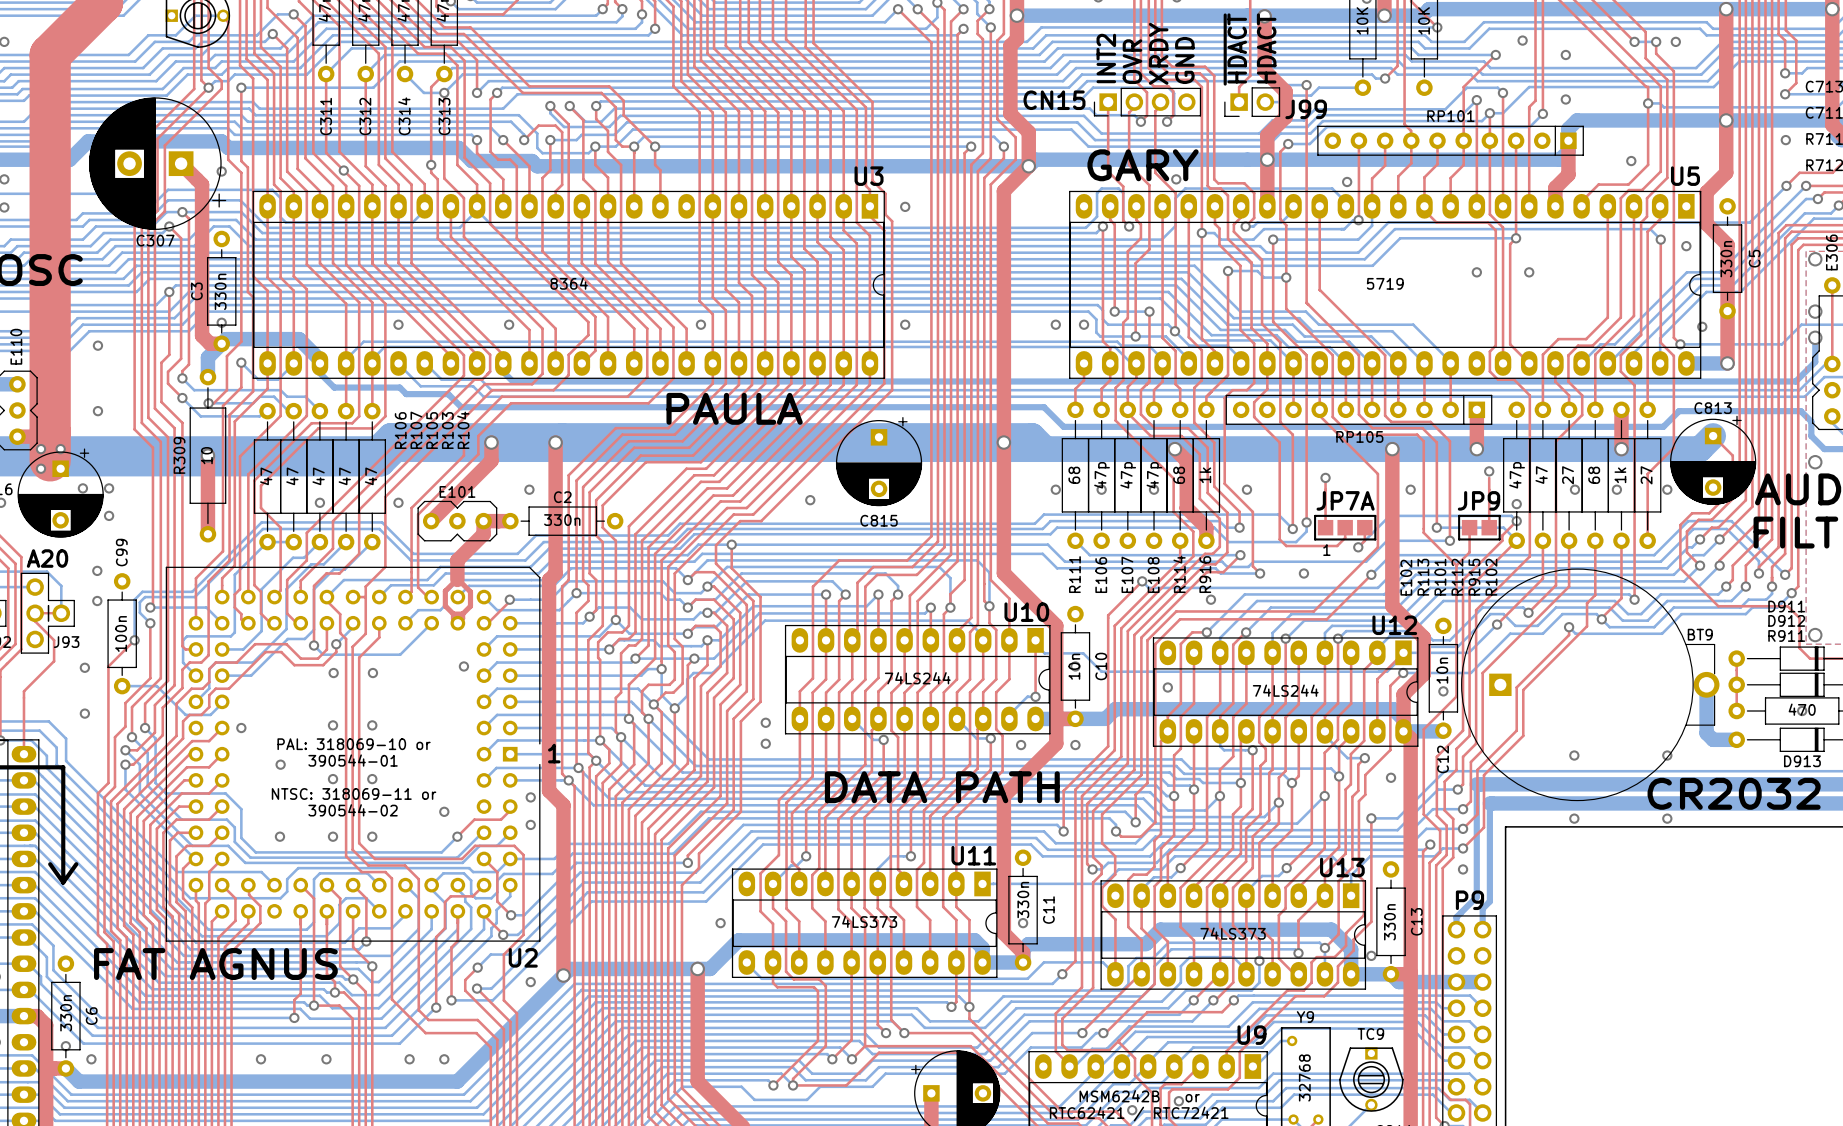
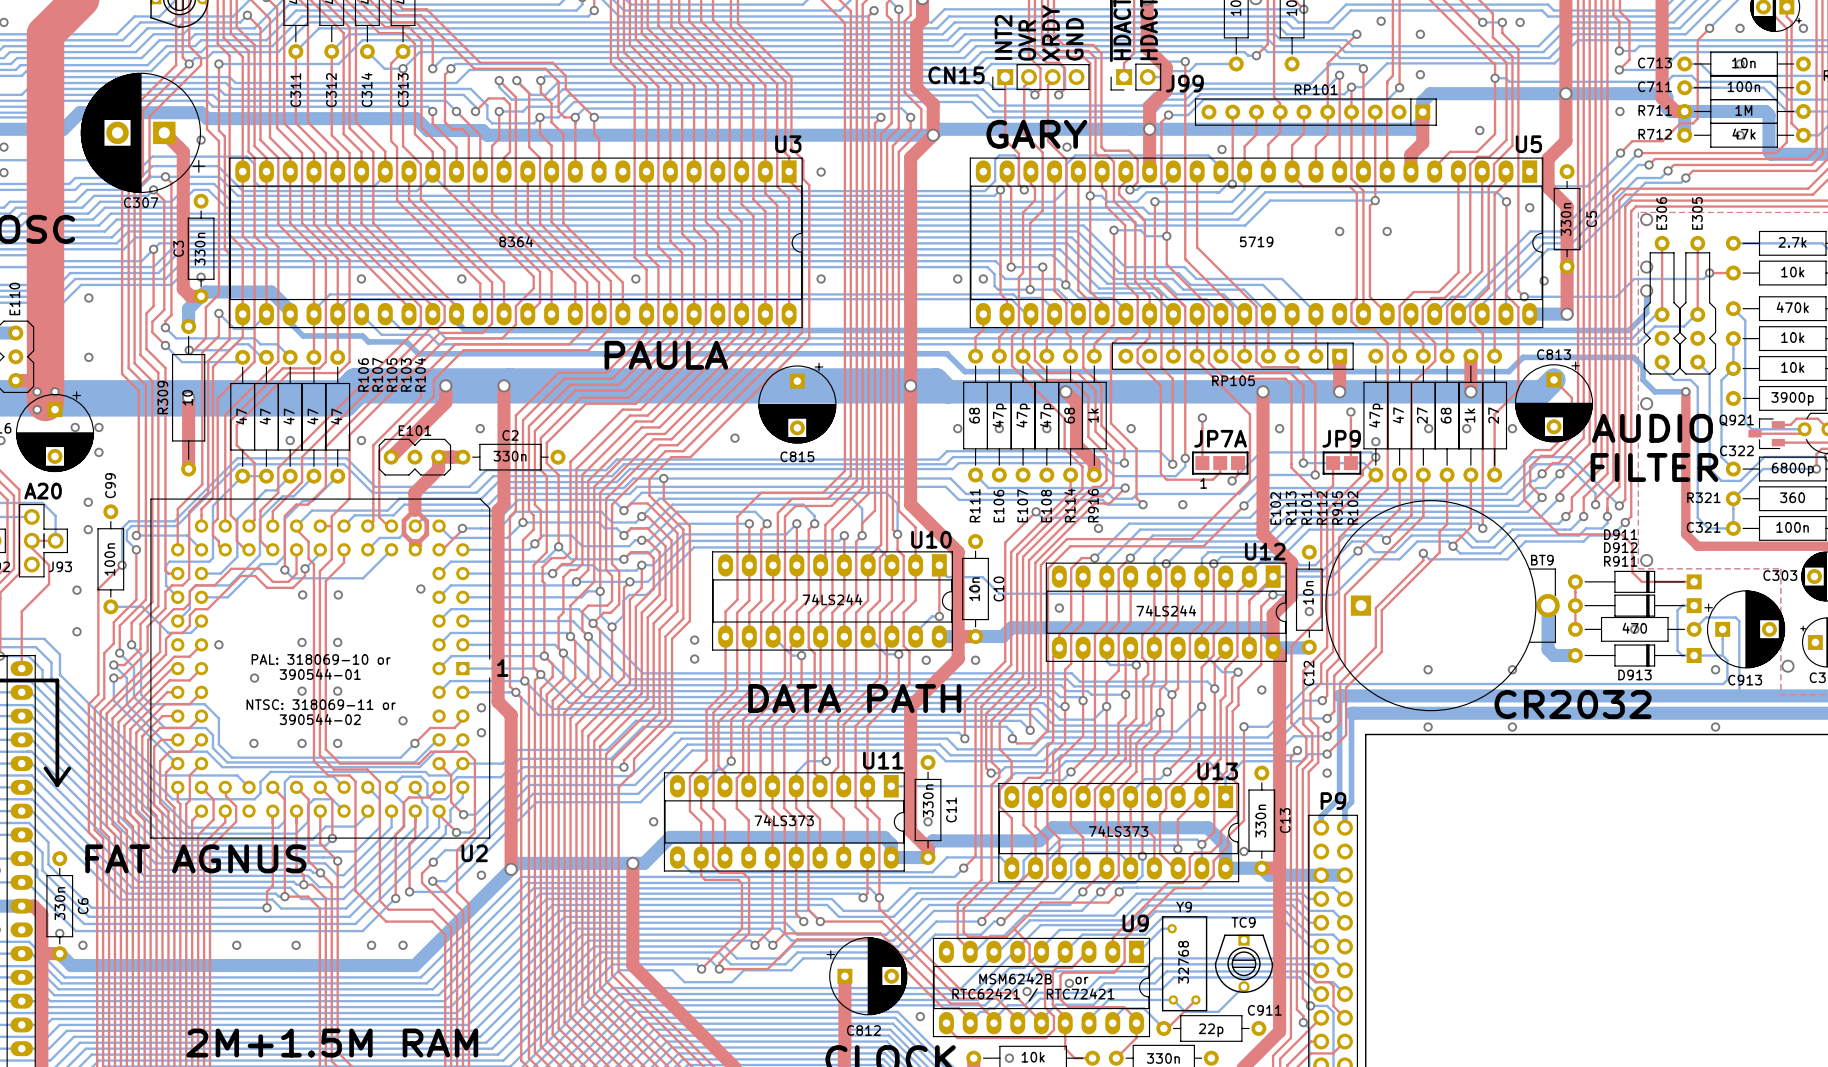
via: (431, 164) -> none
via: (343, 170) -> none

